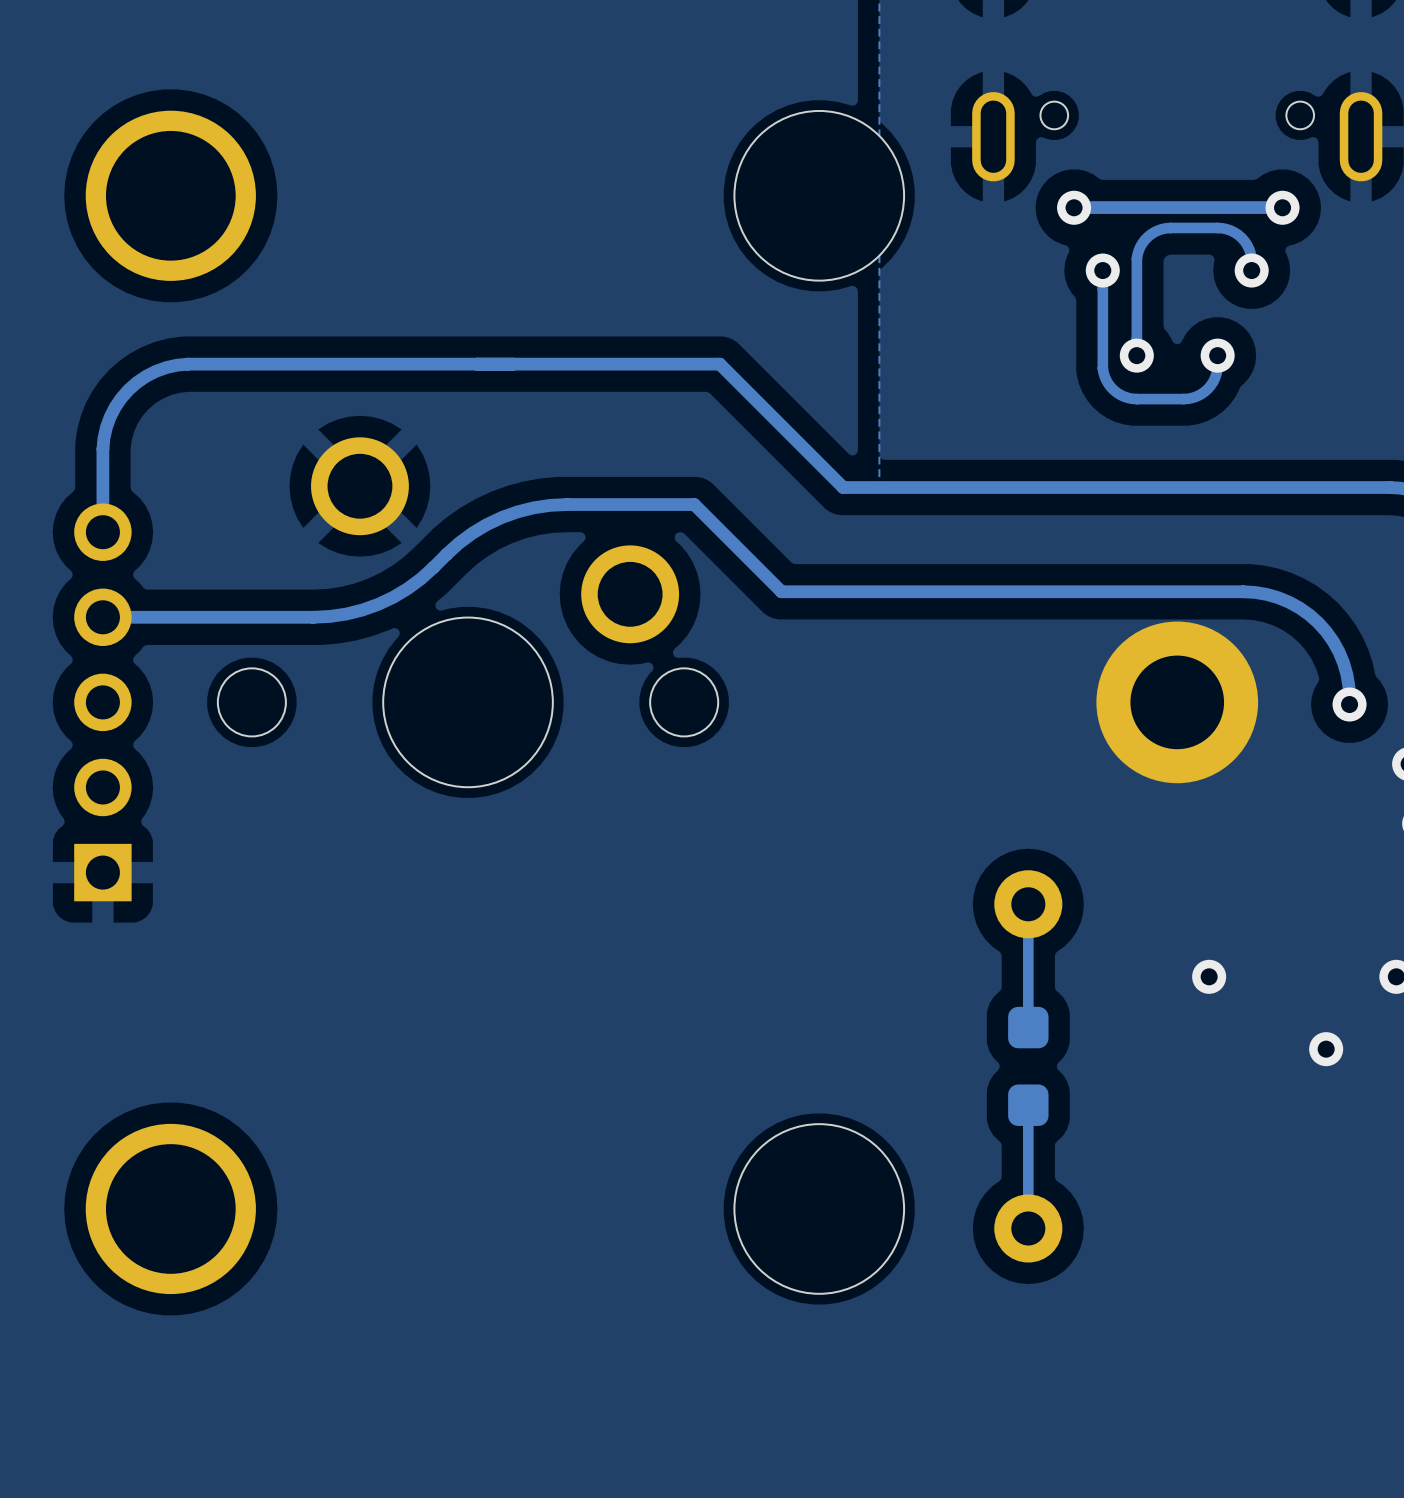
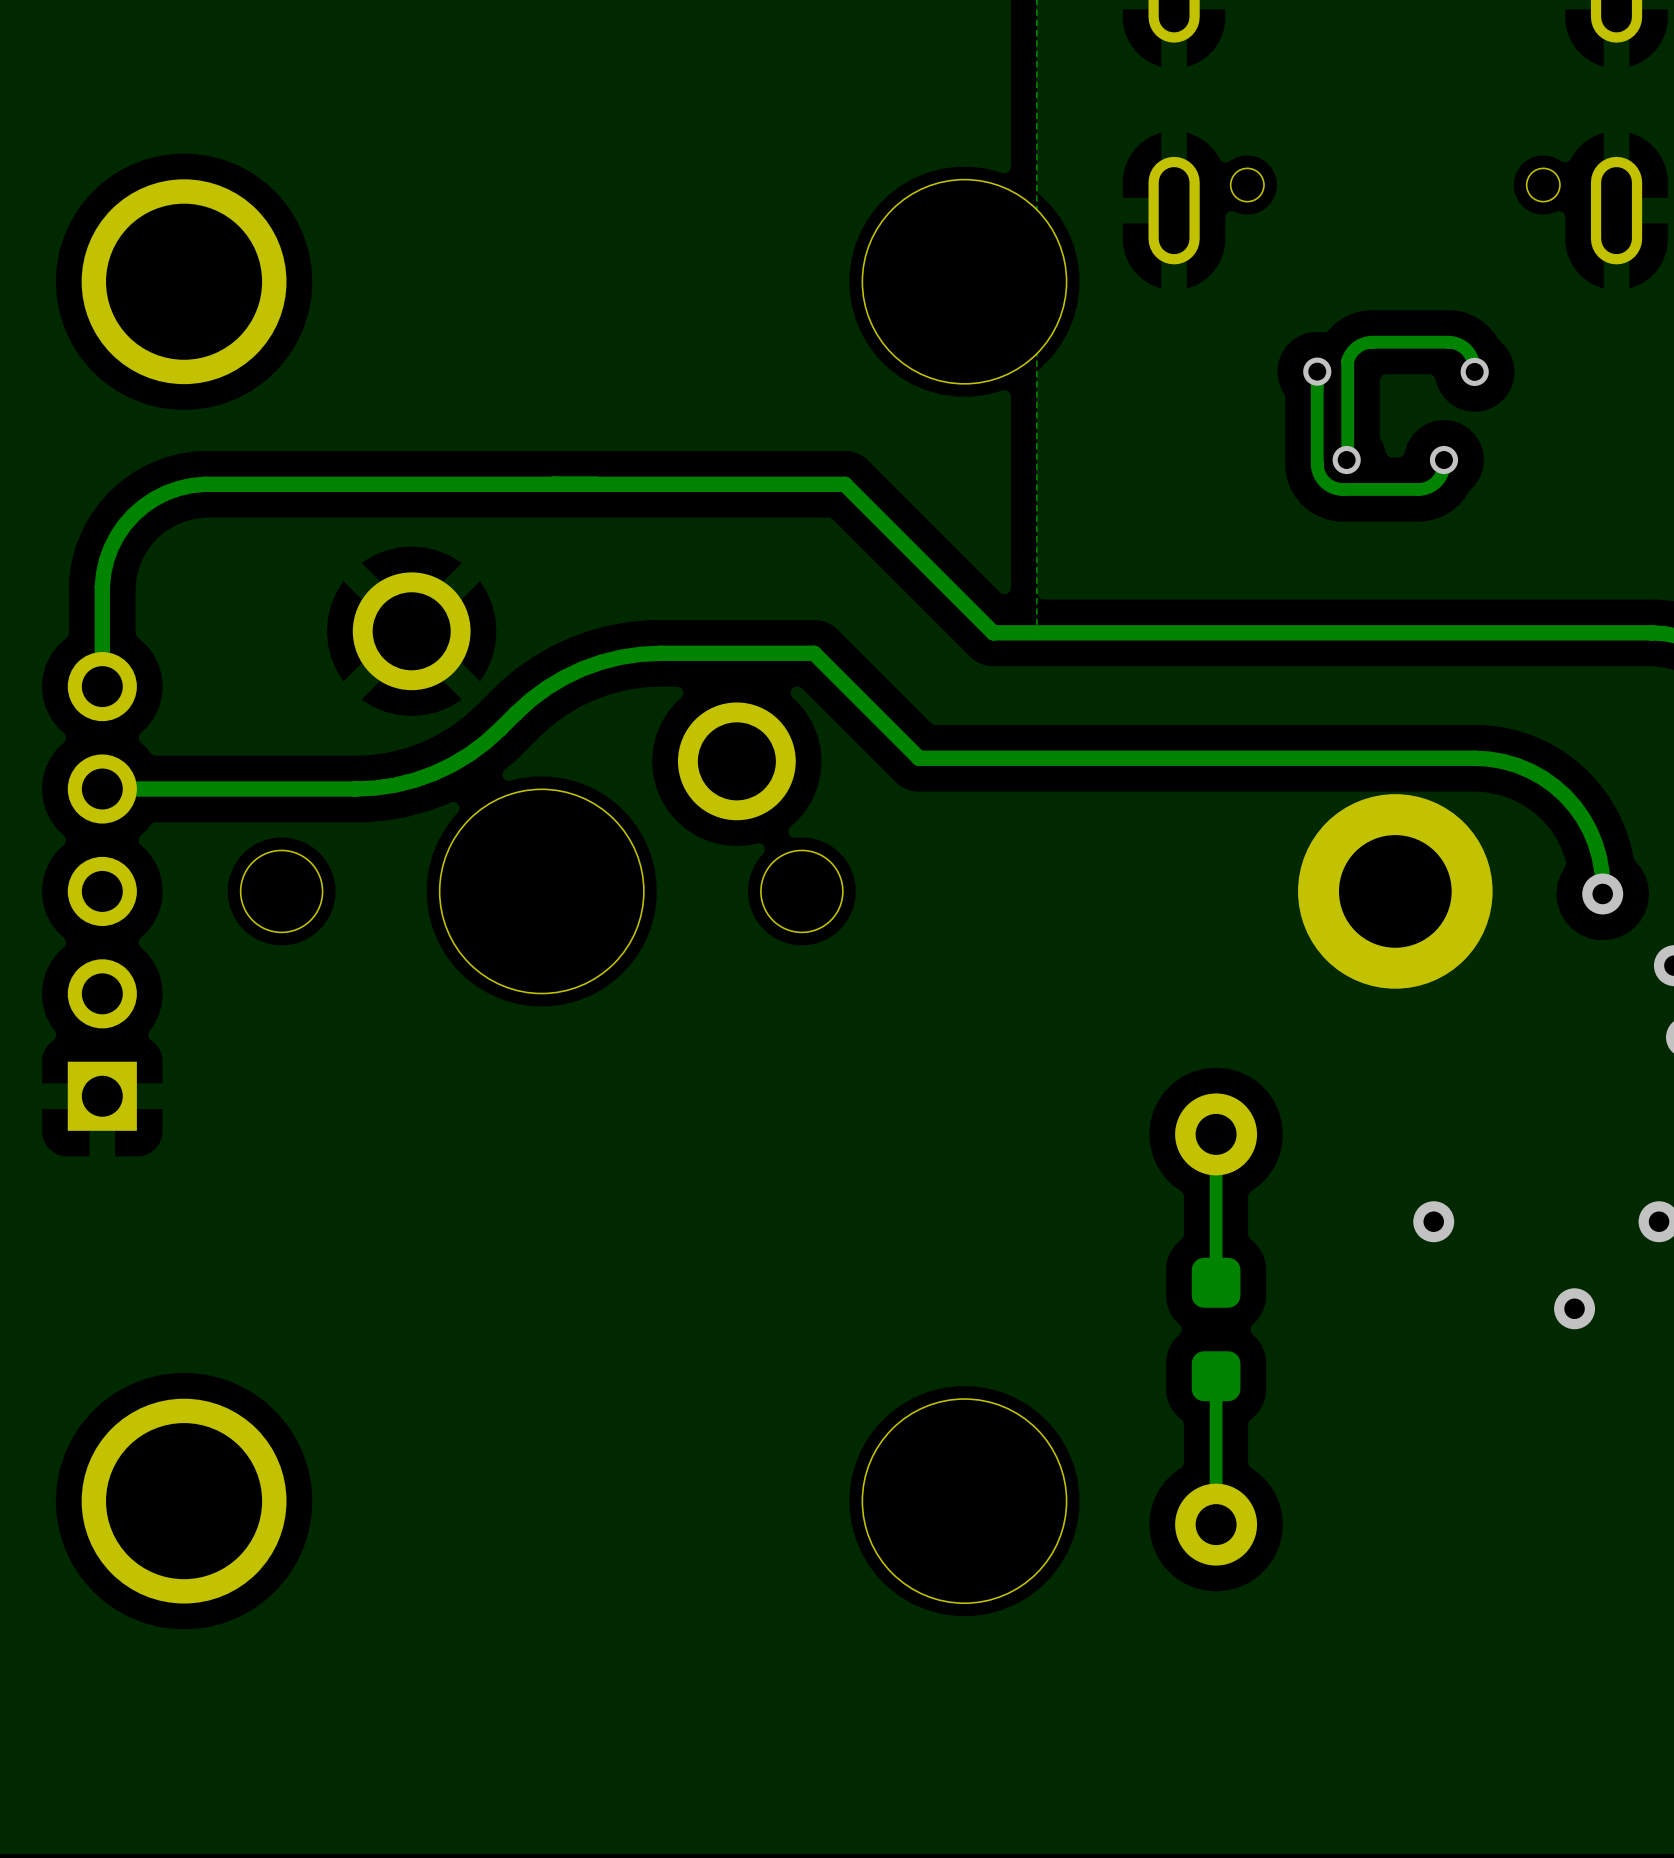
via: (1074, 207) -> none
track: (1282, 207) (1074, 207) -> none
via: (1282, 207) -> none
via size: [1085, 253, 1120, 288] -> [1303, 357, 1332, 386]
via size: [1234, 253, 1269, 288] -> [1460, 357, 1489, 387]
track: (1251, 262) (1249, 248) (1244, 241) (1234, 232) (1226, 229) (1166, 228) (1151, 234) (1142, 243) (1136, 258) (1136, 338) -> none
track: none -> (1473, 367) (1471, 358) (1466, 349) (1451, 342) (1372, 342) (1357, 347) (1347, 360) (1347, 458)
track: none -> (1317, 371) (1317, 467) (1320, 476) (1327, 484) (1342, 489) (1421, 489) (1436, 481) (1442, 473) (1443, 463)
track: (1102, 288) (1102, 368) (1106, 380) (1117, 392) (1132, 398) (1192, 397) (1204, 392) (1210, 385) (1216, 373) (1217, 365) -> none
via size: [1119, 338, 1154, 373] -> [1332, 445, 1361, 475]
via size: [1200, 338, 1235, 373] -> [1429, 445, 1459, 475]

